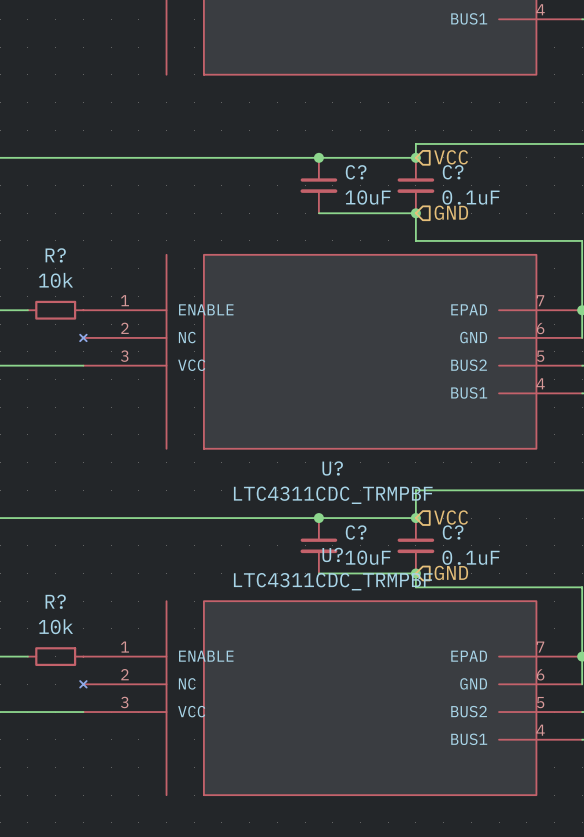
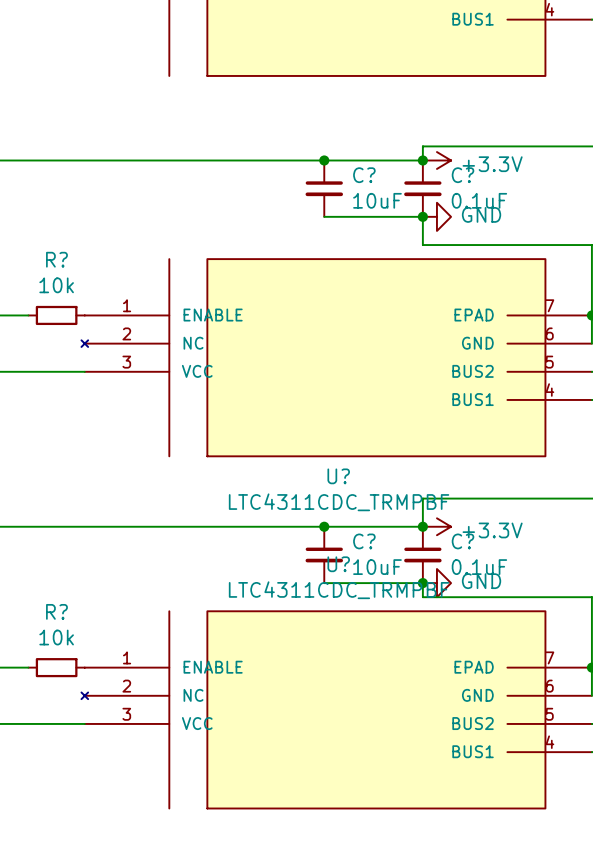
power symbol: none -> +3.3V (436, 160)
hierarchical label: VCC (451, 157) -> none
hierarchical label: GND (451, 212) -> none
power symbol: none -> GND (436, 216)
hierarchical label: VCC (451, 517) -> none
power symbol: none -> +3.3V (436, 526)
hierarchical label: GND (451, 572) -> none
power symbol: none -> GND (436, 583)

